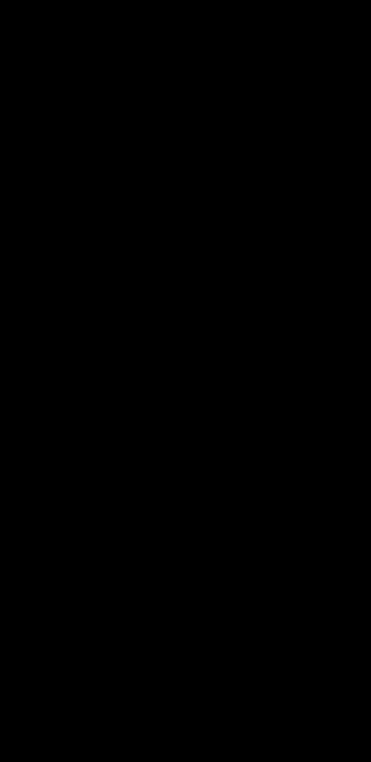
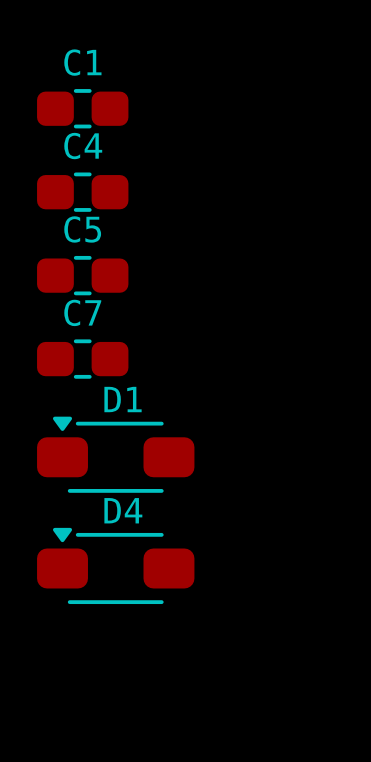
C1: none -> (82, 108)
C4: none -> (82, 192)
C5: none -> (82, 275)
C7: none -> (82, 359)
D1: none -> (115, 454)
D4: none -> (115, 565)

